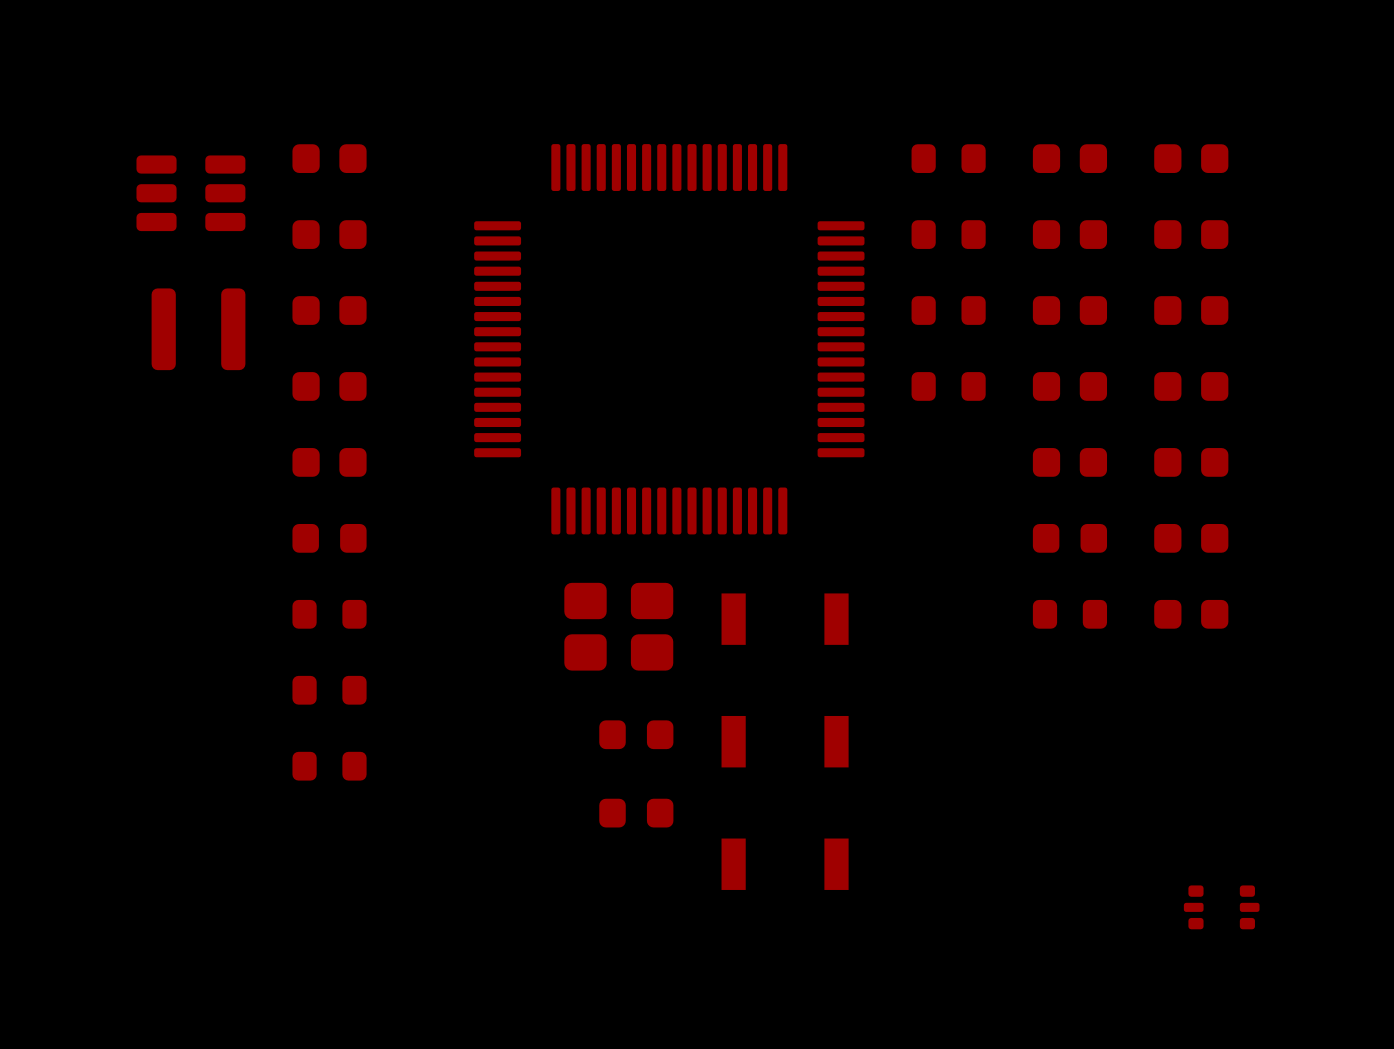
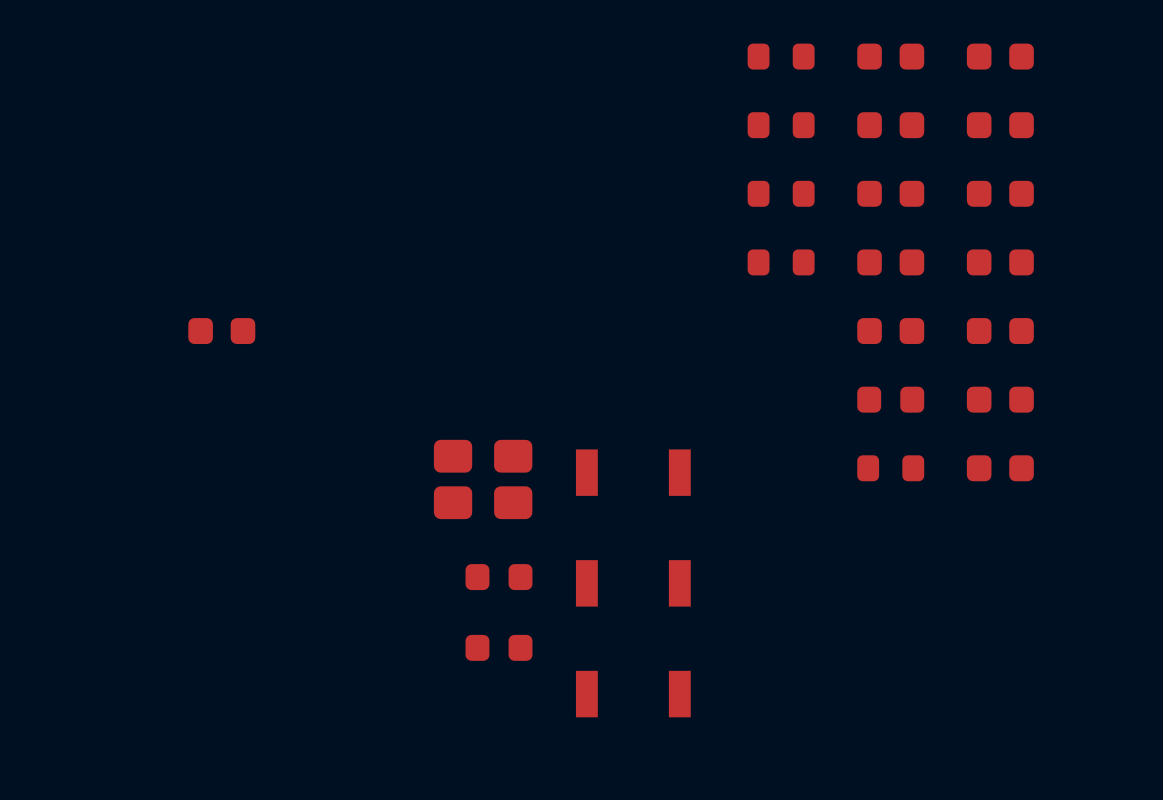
part: (329, 158) -> none
part: (190, 193) -> none
part: (329, 234) -> none
part: (329, 310) -> none
part: (198, 329) -> none
part: (669, 339) -> none
part: (329, 386) -> none
part: (329, 538) -> none
part: (329, 614) -> none
part: (329, 690) -> none
part: (329, 766) -> none
part: (1221, 907) -> none

